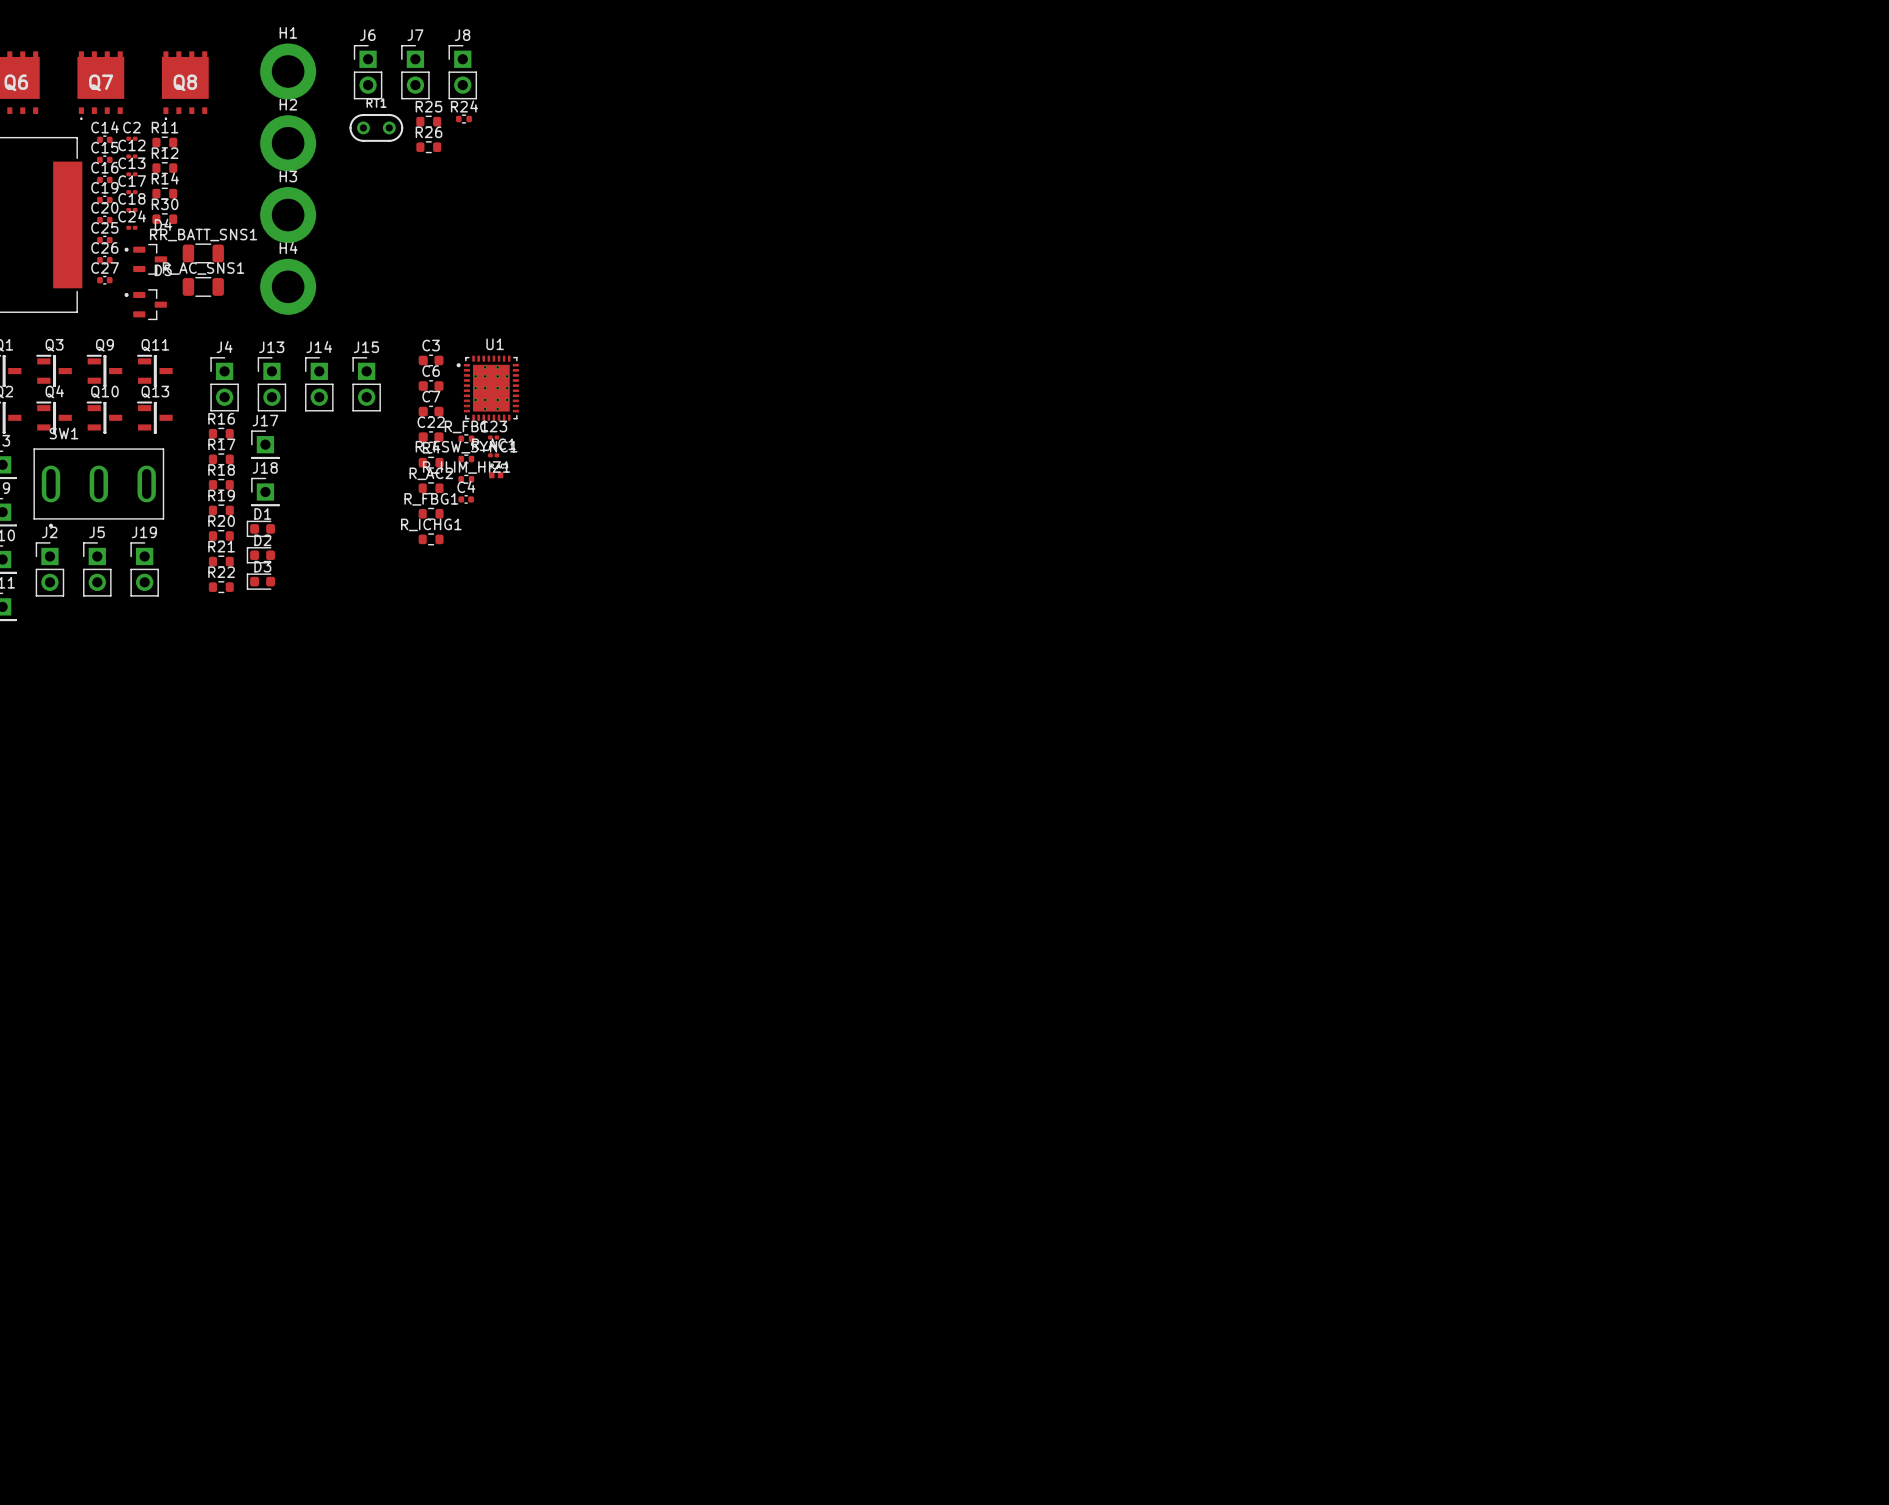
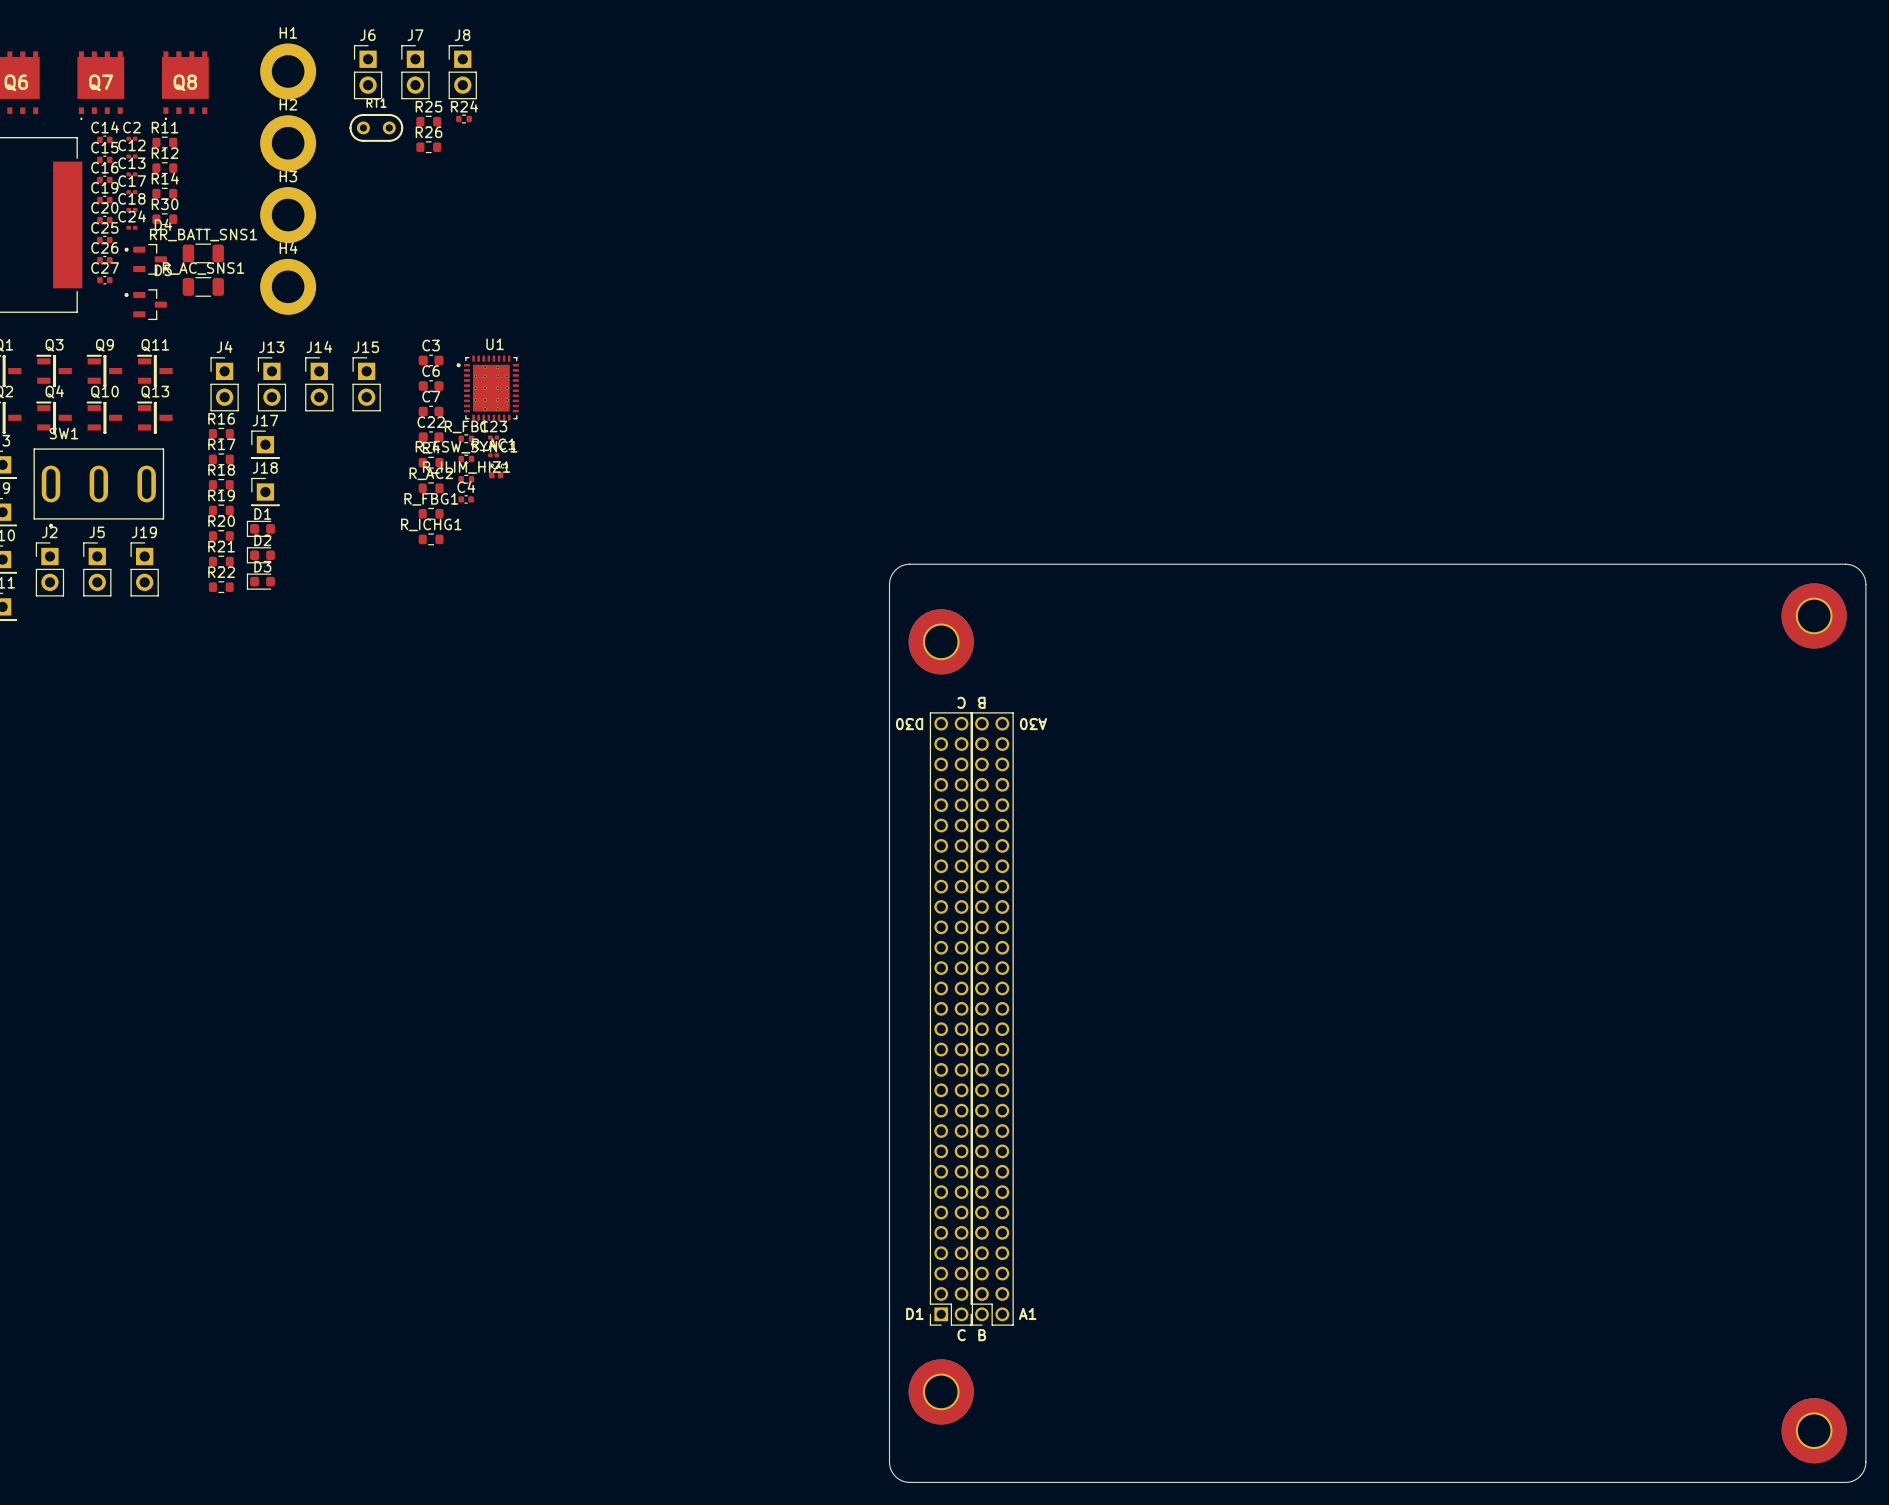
board edge: none -> (909, 564) (1845, 564) (1852, 565) (1859, 570) (1864, 577) (1865, 584) (1865, 1462) (1864, 1468) (1859, 1476) (1854, 1480) (1845, 1482) (909, 1482) (903, 1481) (895, 1476) (891, 1470) (889, 1462) (889, 584) (890, 577) (895, 570) (903, 565) (909, 564)
part: none -> (1814, 615)
part: none -> (941, 641)
text: none -> C (961, 702)
text: none -> B (981, 702)
text: none -> D30 (909, 724)
text: none -> A30 (1033, 724)
part: none -> (951, 1019)
part: none -> (992, 1019)
text: none -> D1 (914, 1313)
text: none -> A1 (1027, 1313)
text: none -> C (961, 1335)
text: none -> B (982, 1335)
part: none -> (941, 1391)
part: none -> (1814, 1430)

